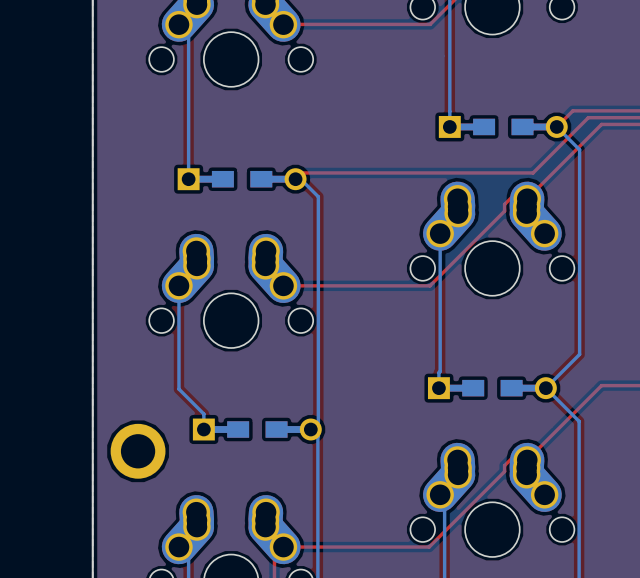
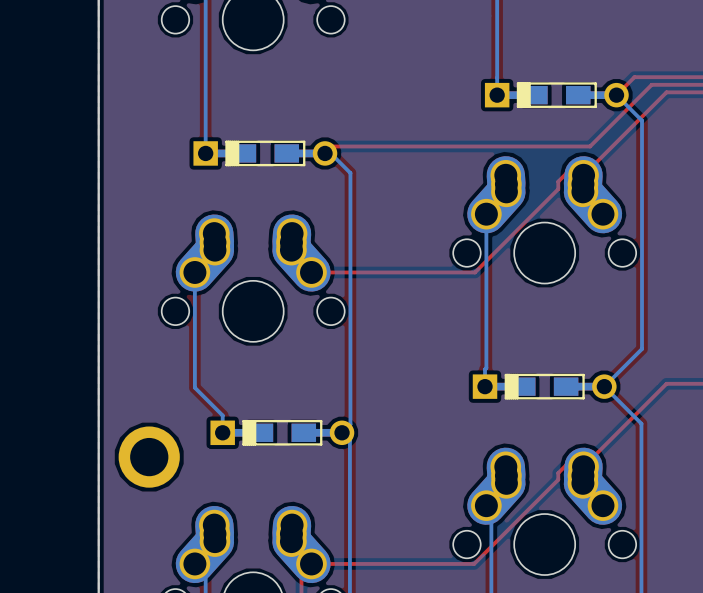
part footprint: [438, 115, 568, 138] -> [484, 82, 629, 108]
part footprint: [177, 168, 307, 191] -> [193, 140, 338, 167]
part footprint: [427, 377, 557, 400] -> [472, 373, 617, 400]
part footprint: [192, 418, 322, 441] -> [210, 419, 355, 446]

